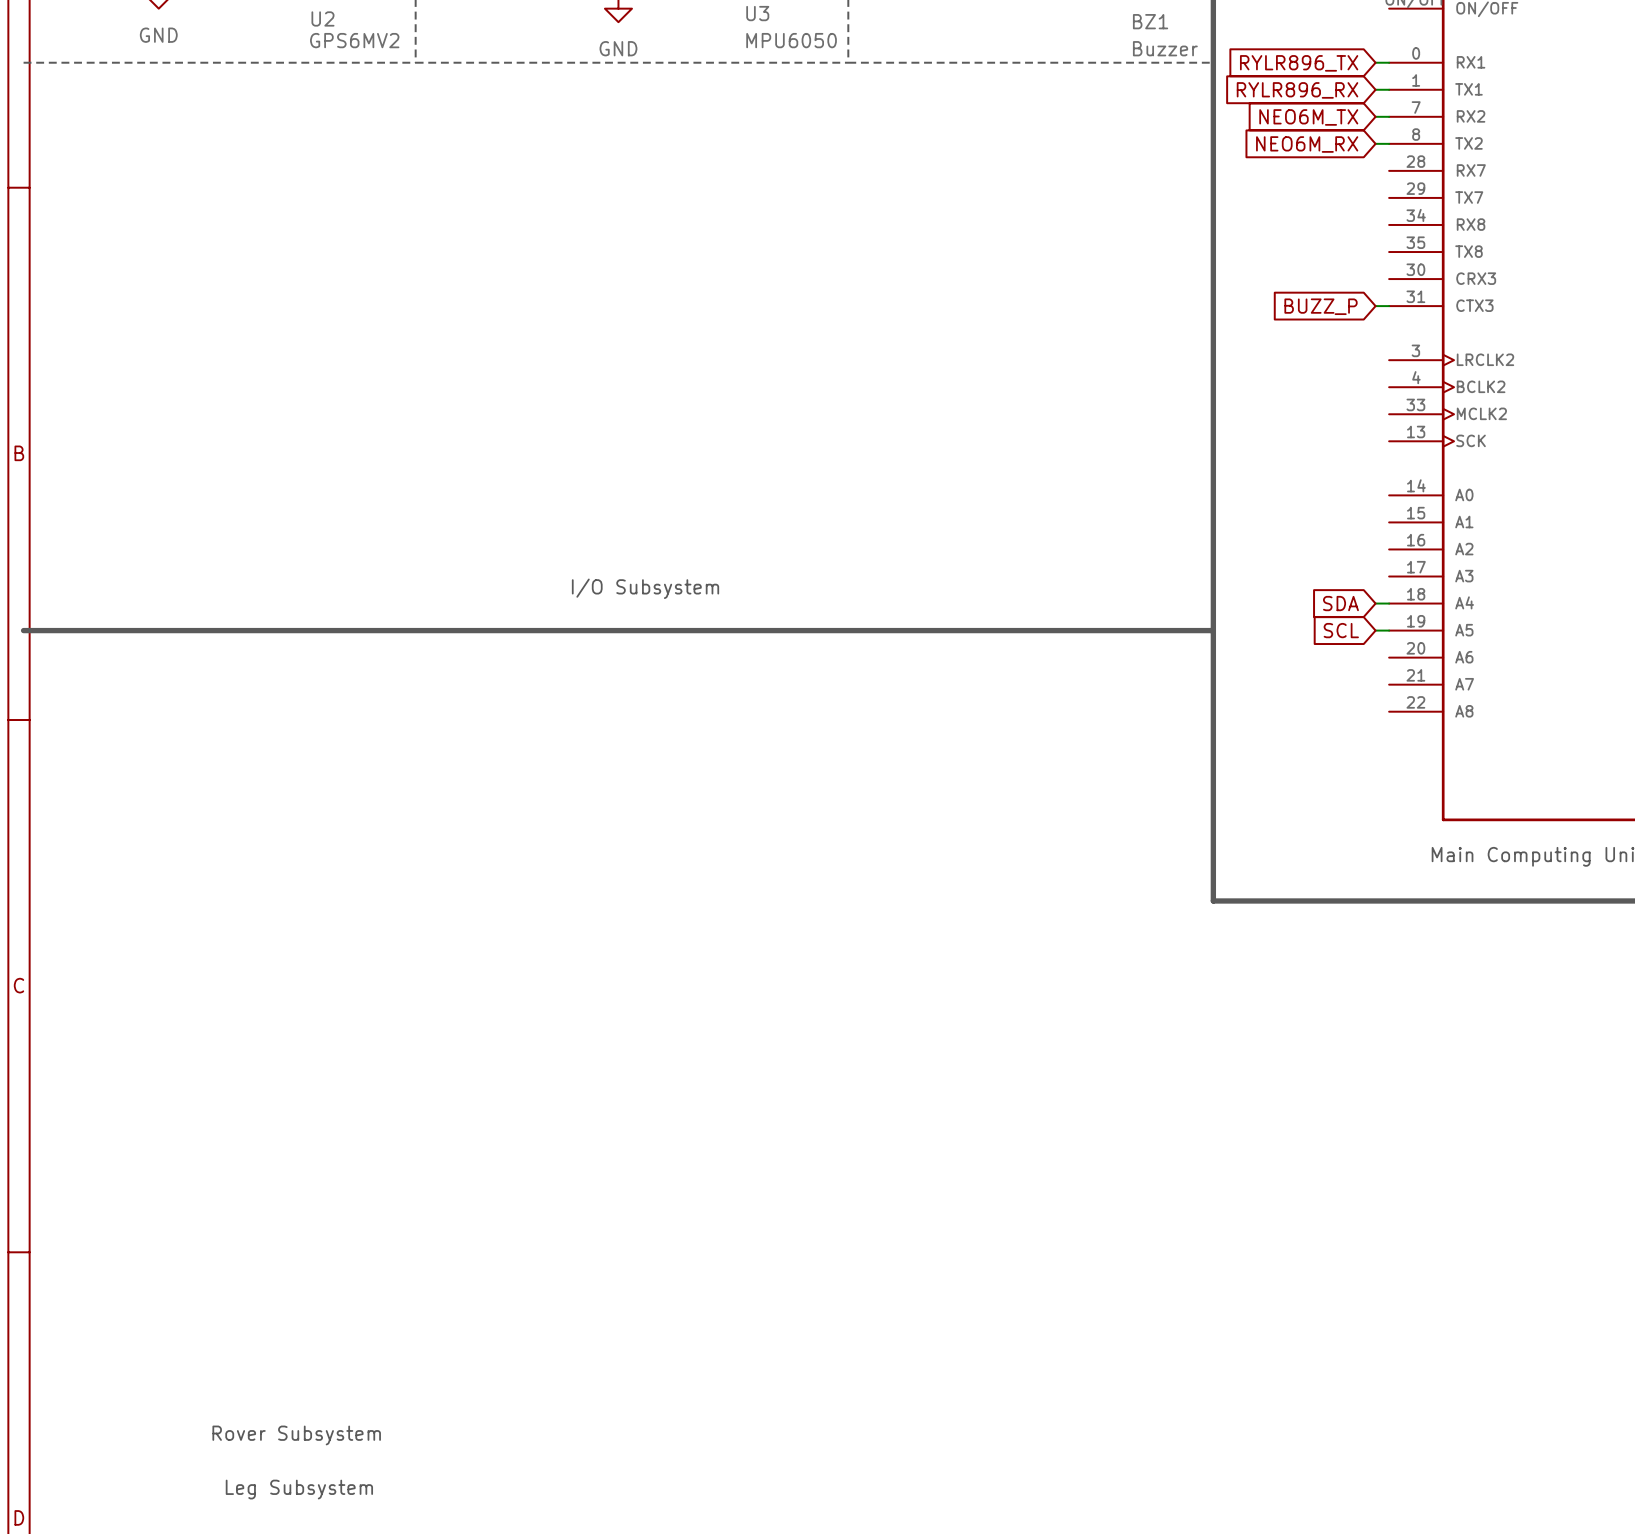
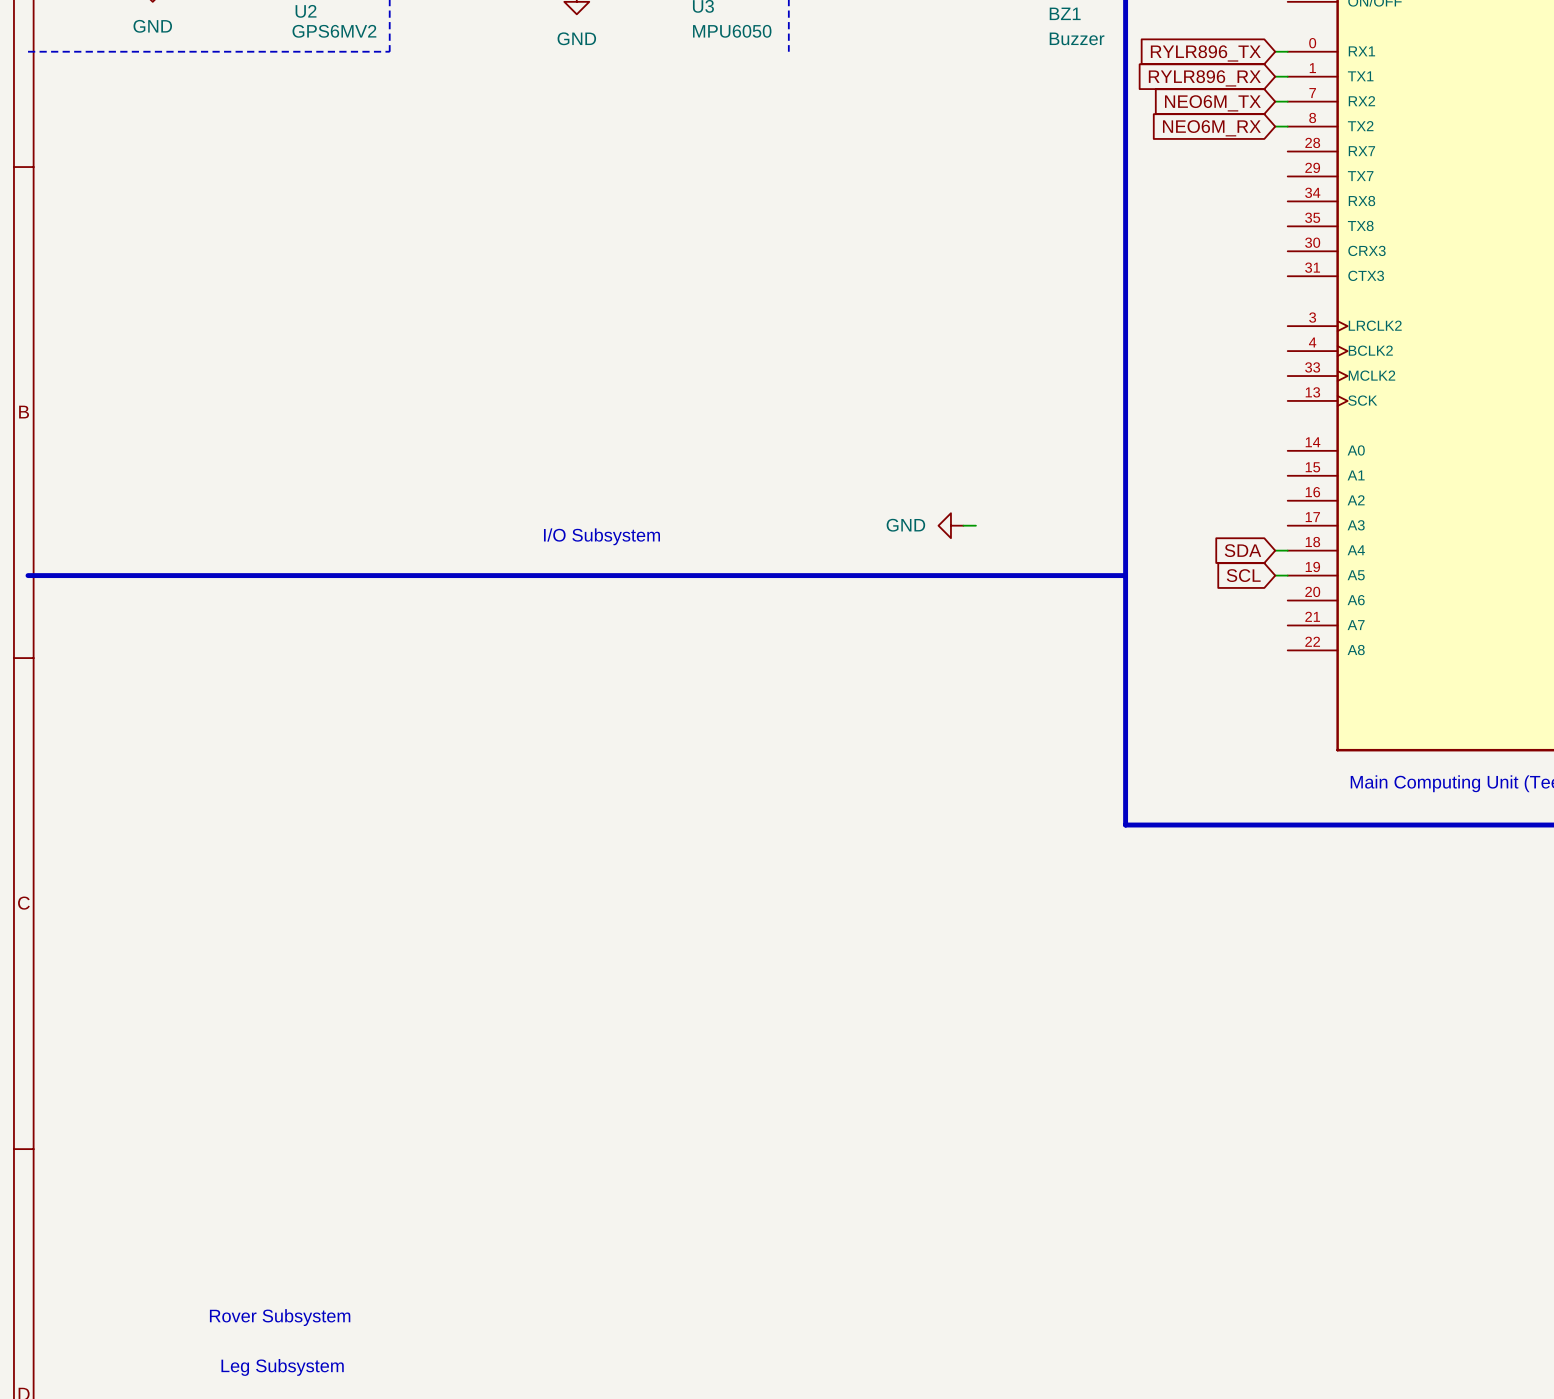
line: (415, 62) (1213, 62) -> none
global label: BUZZ_P (1321, 306) -> none
wire: (1375, 306) (1389, 306) -> none
power symbol: none -> GND (950, 525)
wire: none -> (963, 525) (975, 525)

